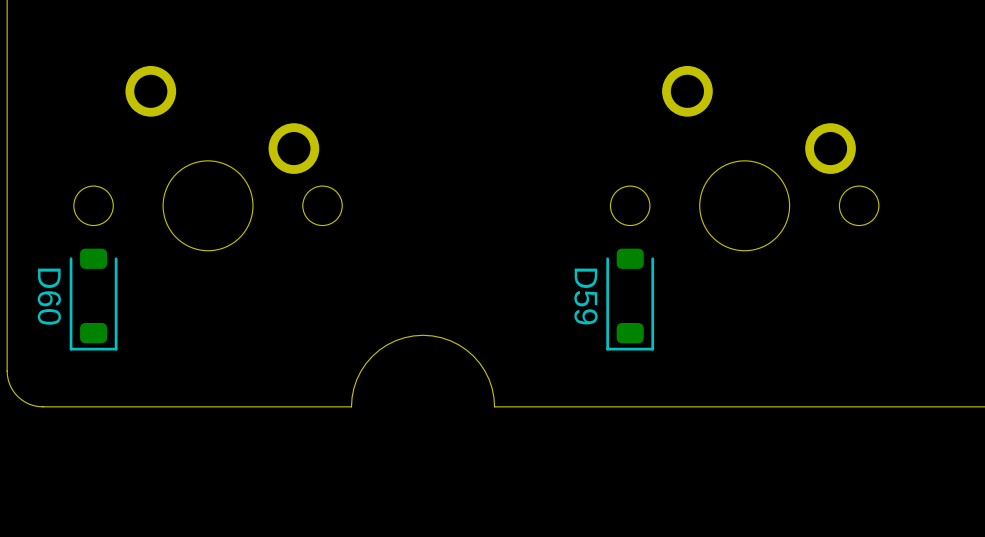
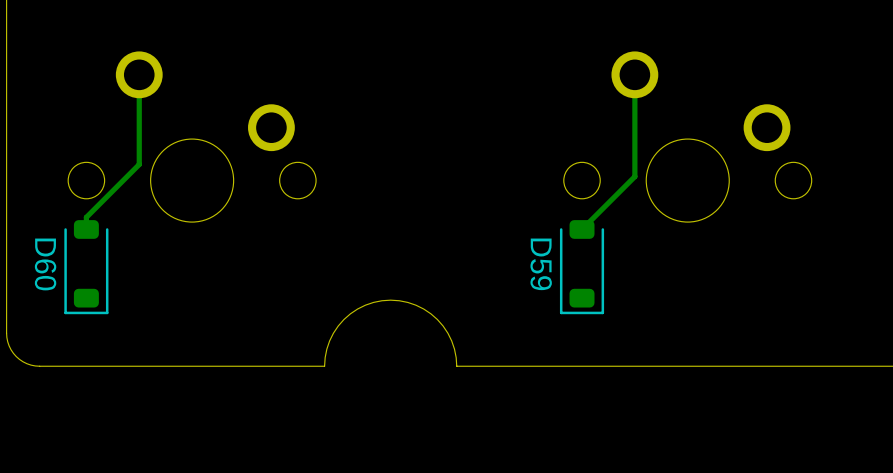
track: none -> (139, 74) (139, 164) (86, 217) (86, 229)
track: none -> (634, 74) (634, 176) (582, 229)

